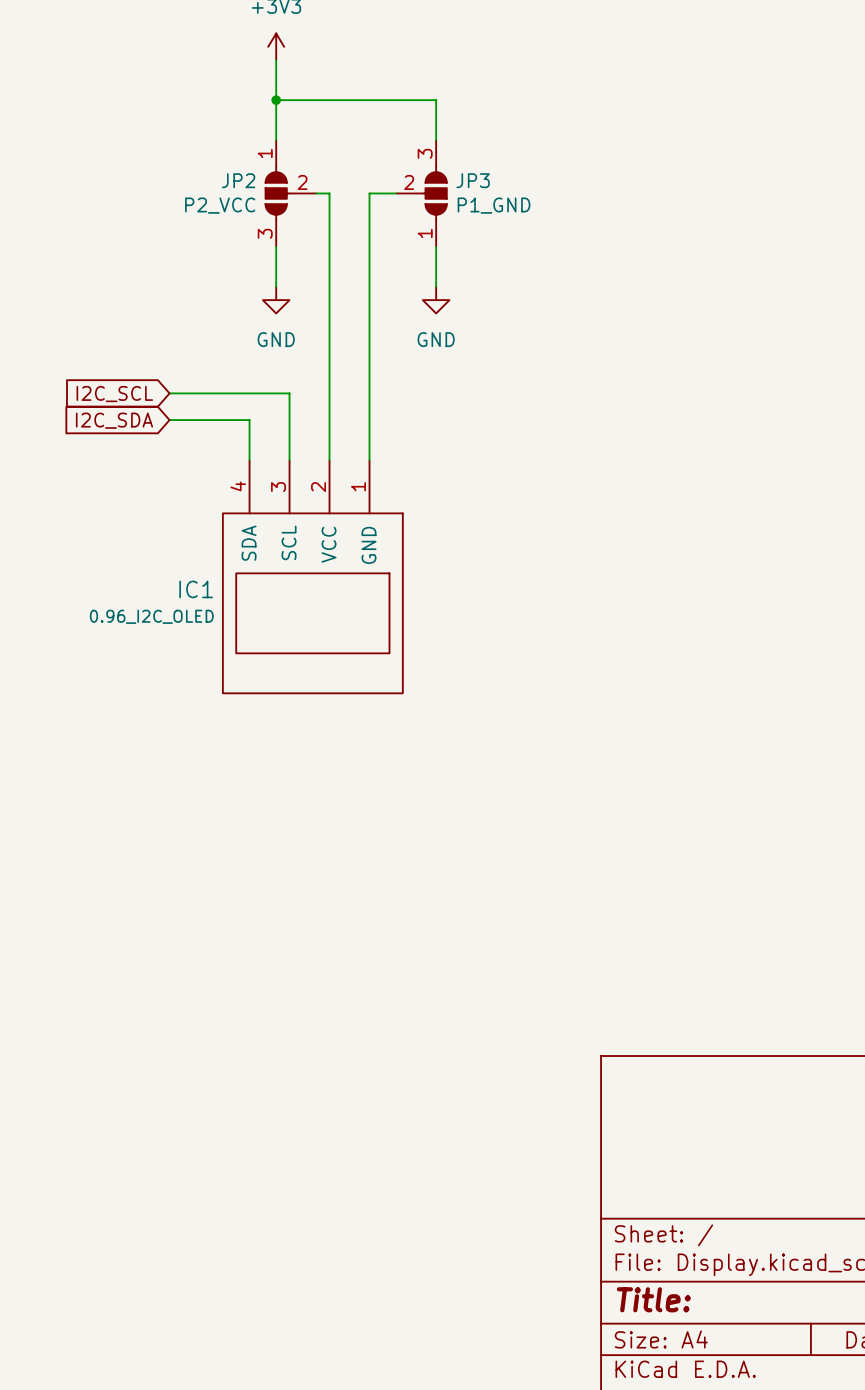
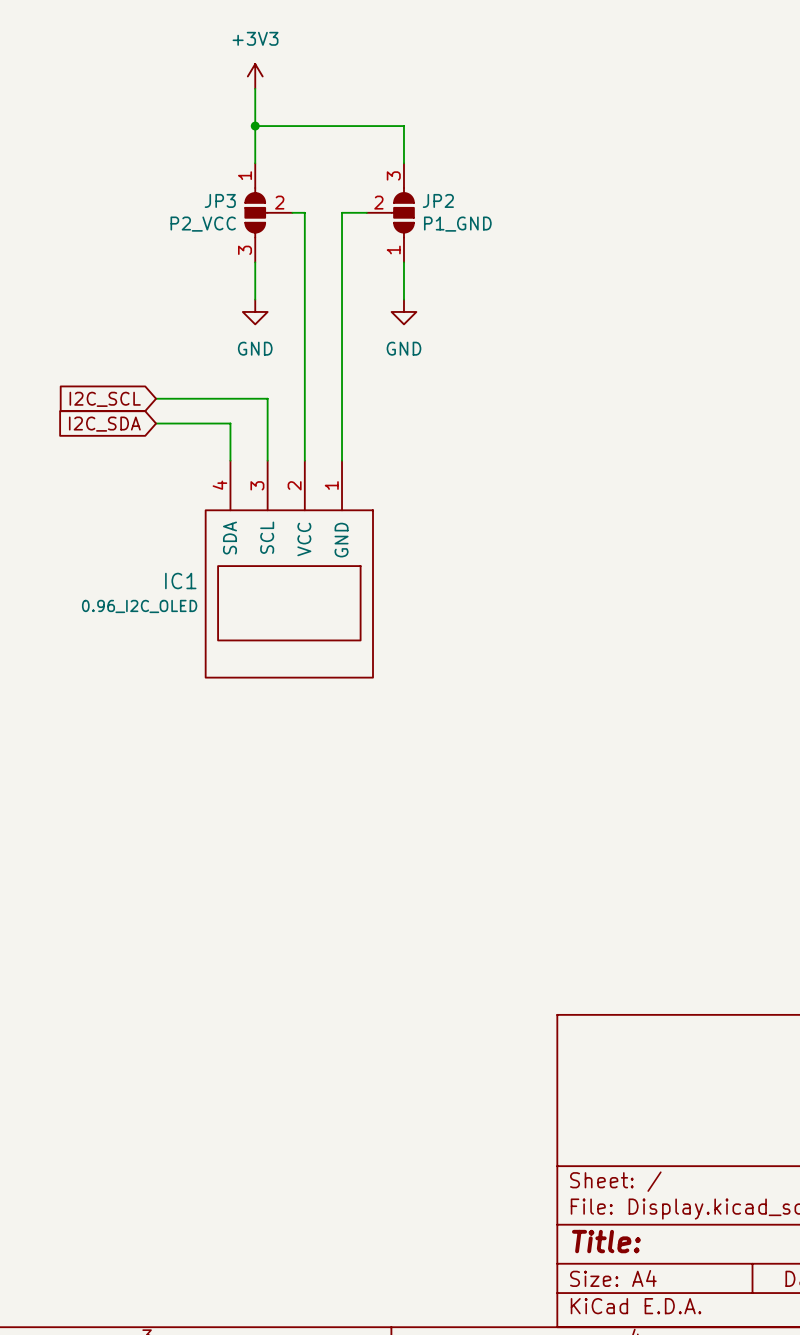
JP2 name: JP2 (238, 180) -> JP3 (220, 200)
JP3 name: JP3 (473, 180) -> JP2 (438, 200)

